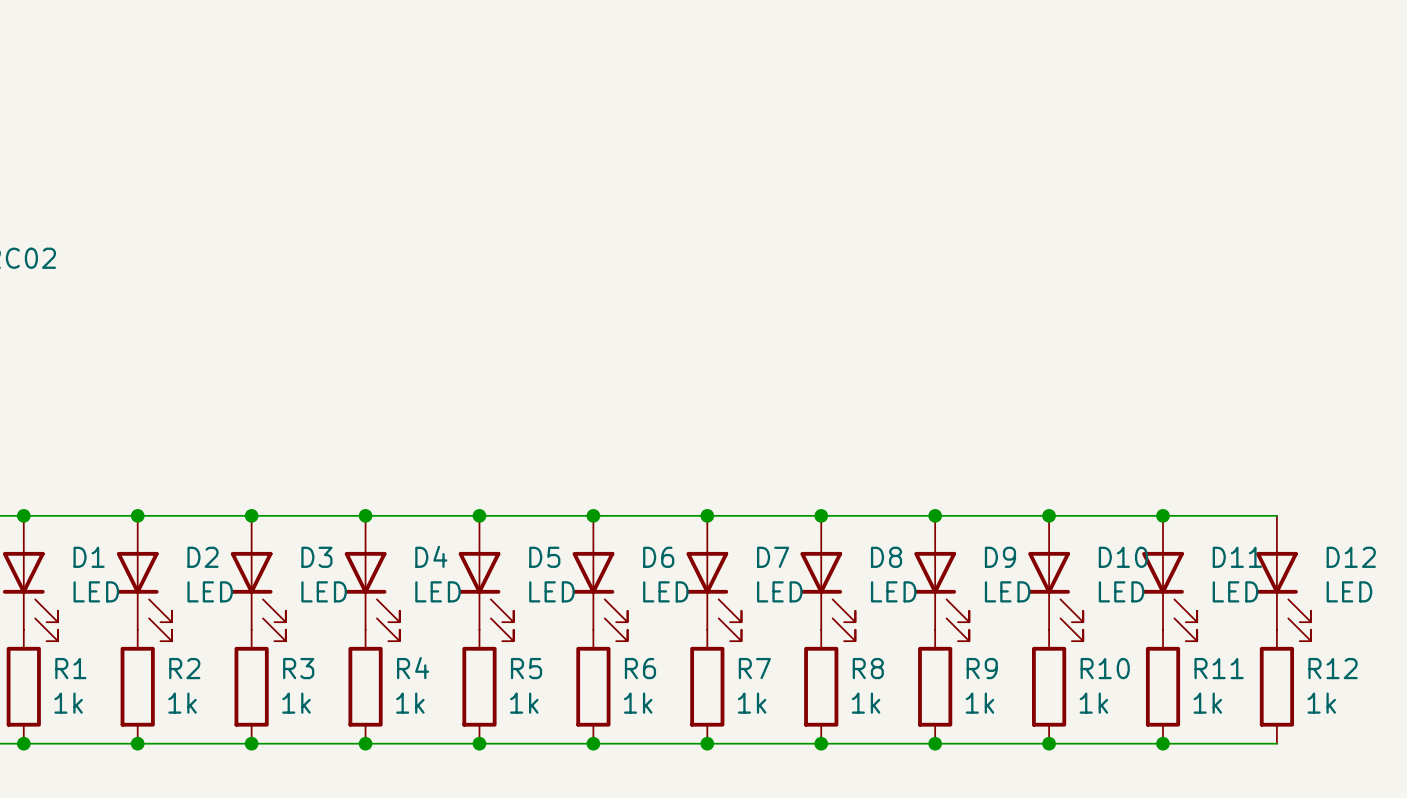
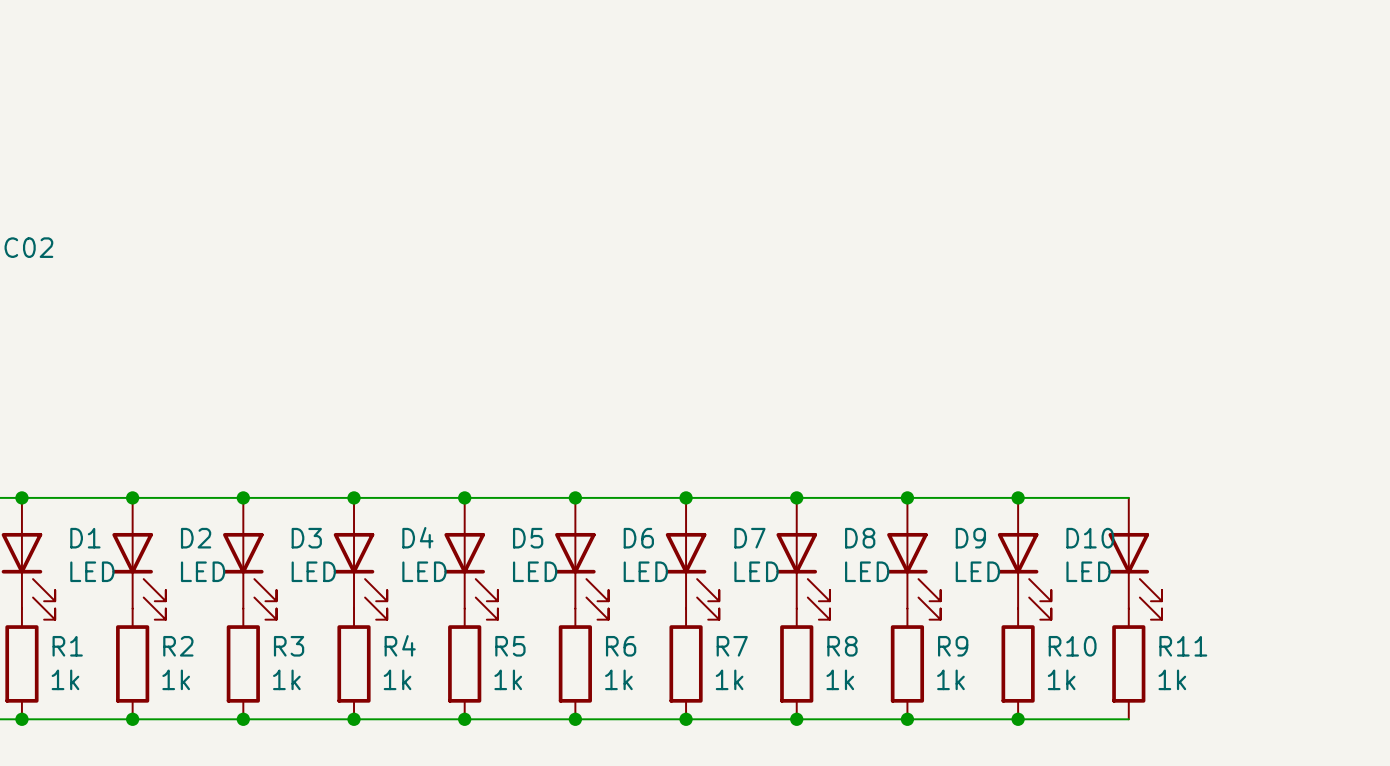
wire: (1163, 515) (1276, 515) -> none
junction: (1163, 515) -> none
D11 name: D11 (1237, 557) -> none
D12: LED (1283, 578) -> none
D11 value: LED (1235, 591) -> none
R12: 1k (1276, 686) -> none
wire: (1163, 743) (1276, 743) -> none
junction: (1163, 743) -> none

